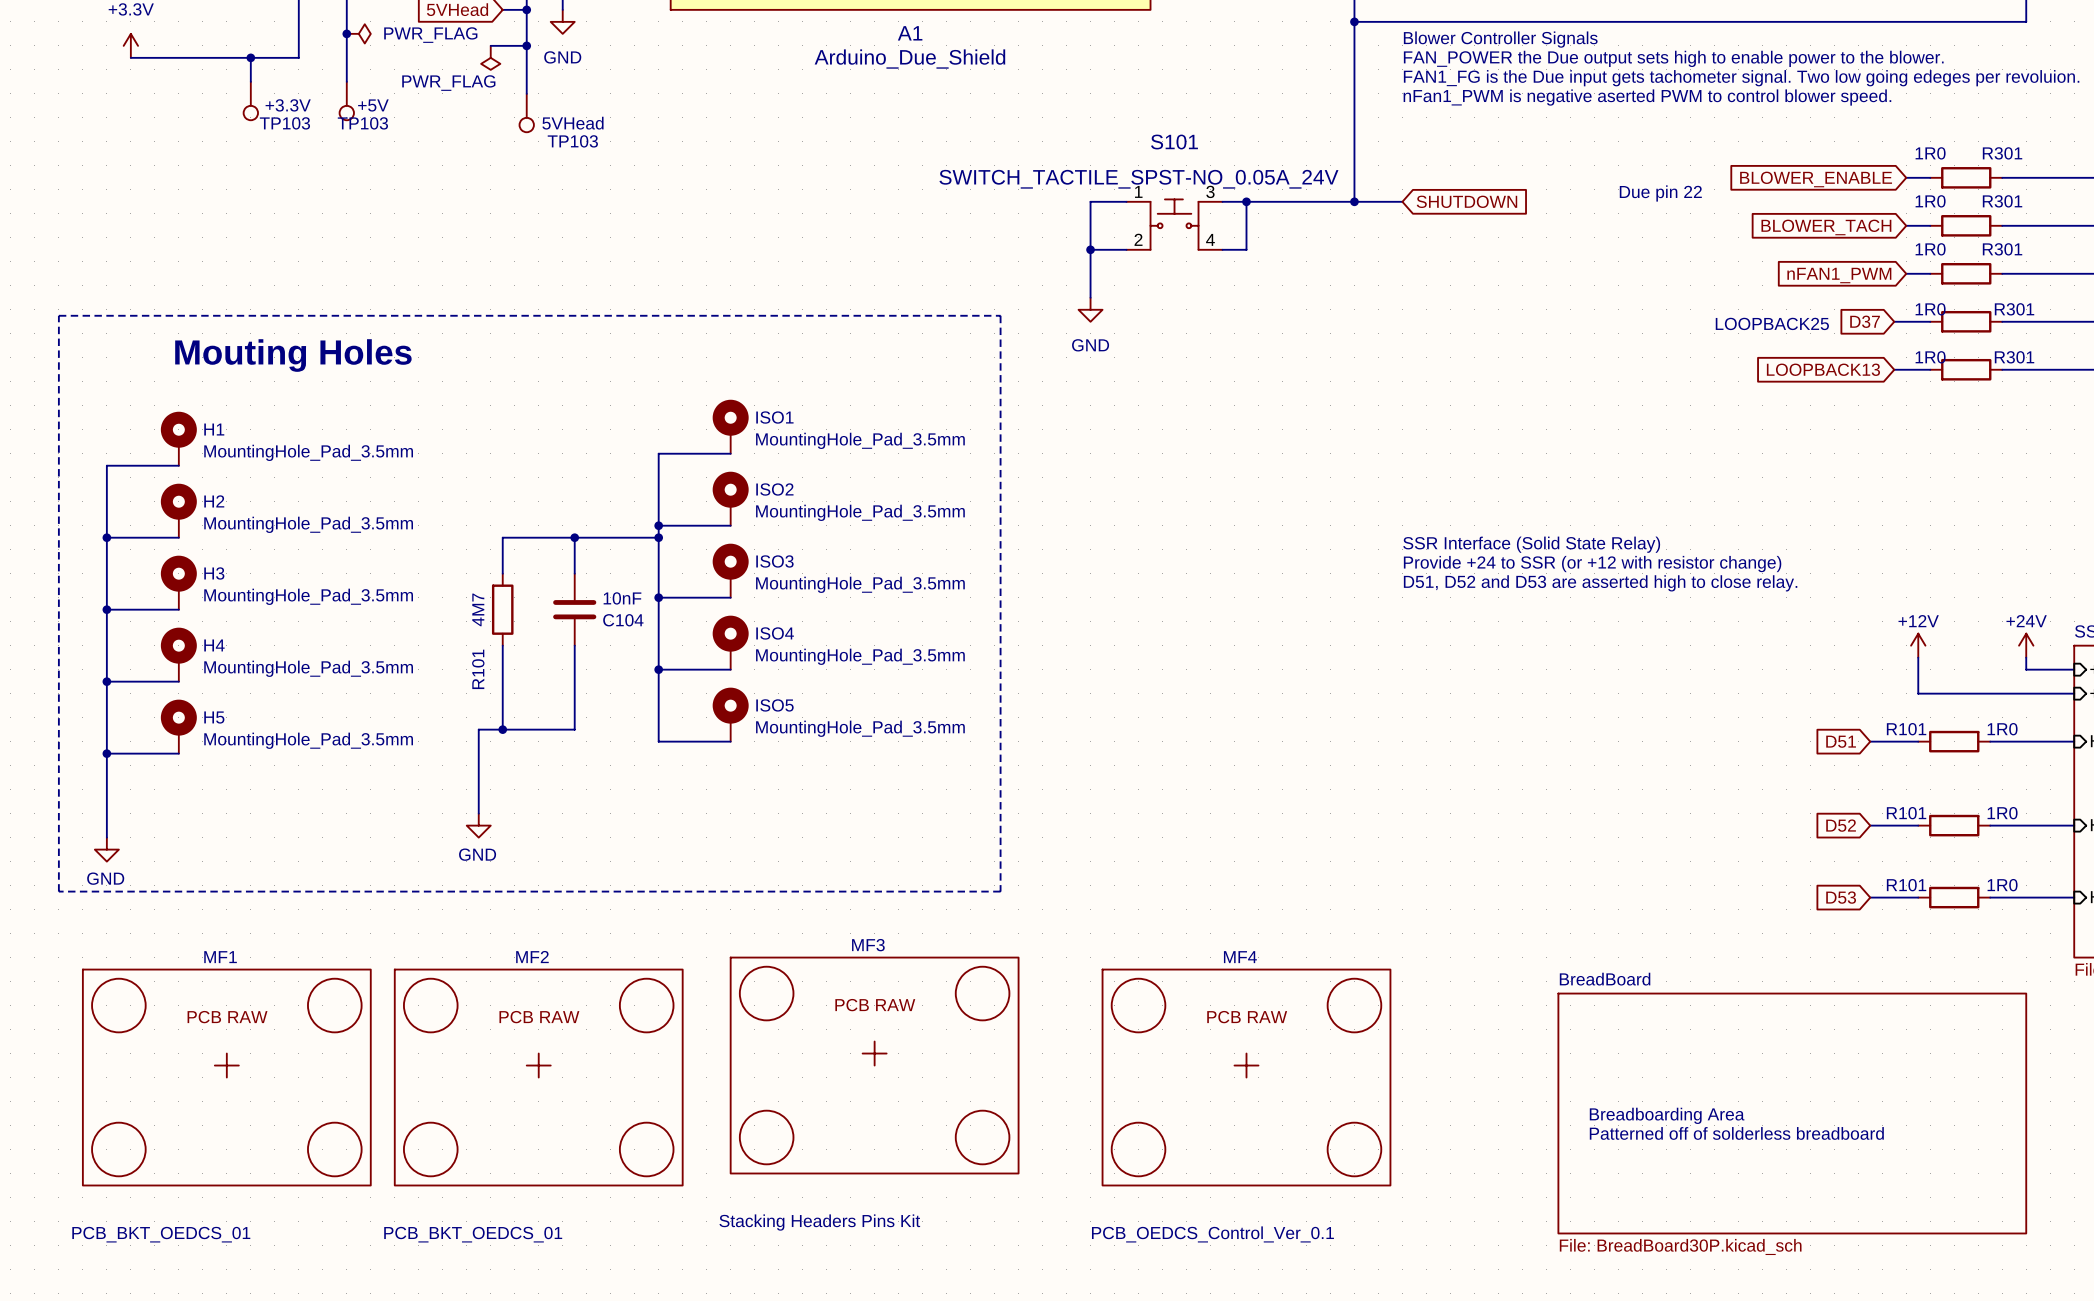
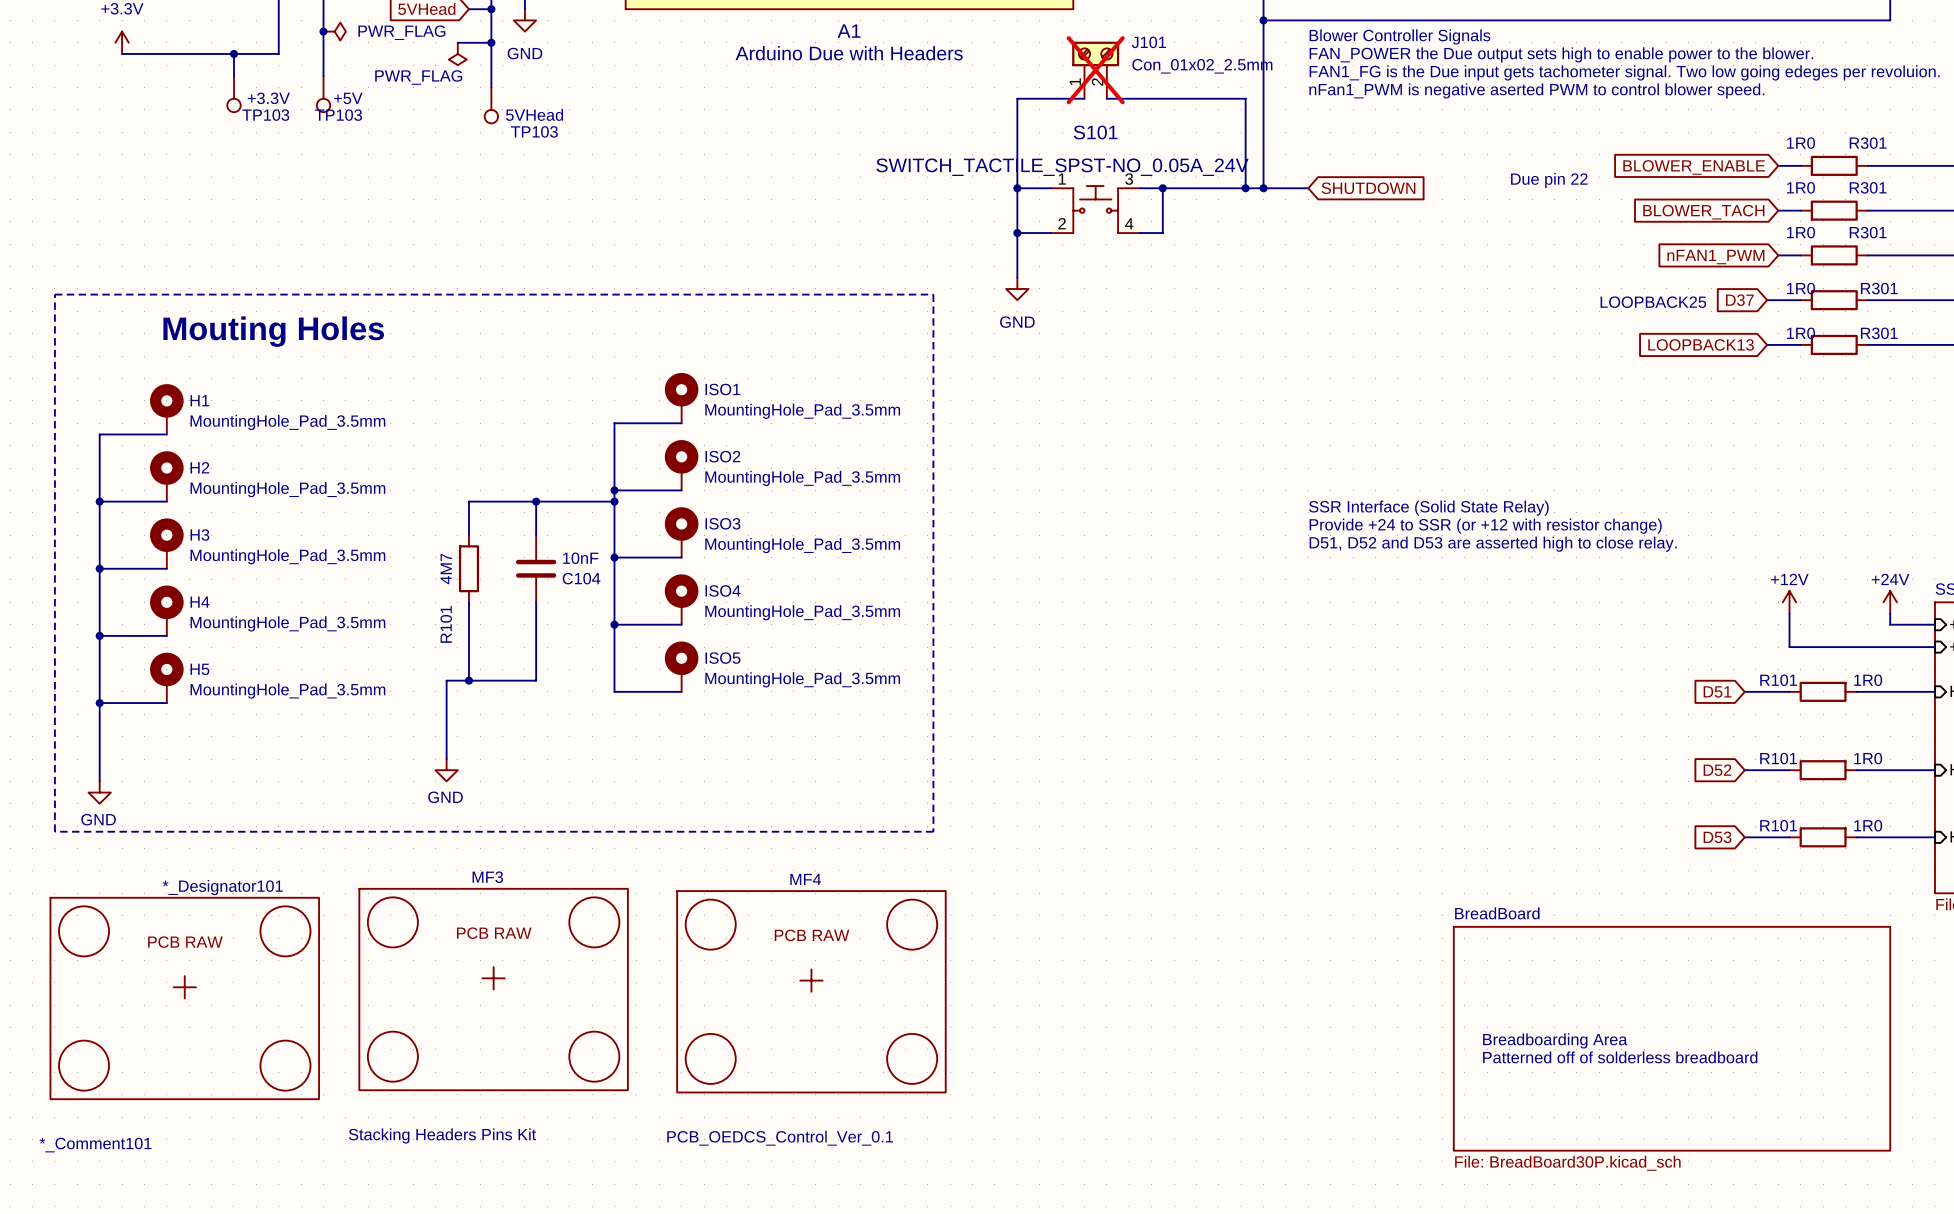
A1 value: Arduino_Due_Shield (909, 59) -> Arduino Due with Headers (849, 53)
J101: none -> Con_01x02_2.5mm (1095, 70)
wire: none -> (1084, 98) (1017, 98) (1017, 188)
wire: none -> (1106, 98) (1245, 98) (1245, 188)
junction: none -> (1017, 188)
junction: none -> (1245, 188)
MF3 position: (874, 1065) -> (493, 989)
*_Designator101: none -> *_Comment101 (184, 998)
MF1: PCB_BKT_OEDCS_01 (226, 1077) -> none
MF2: PCB_BKT_OEDCS_01 (538, 1077) -> none
MF4 position: (1246, 1077) -> (811, 991)

